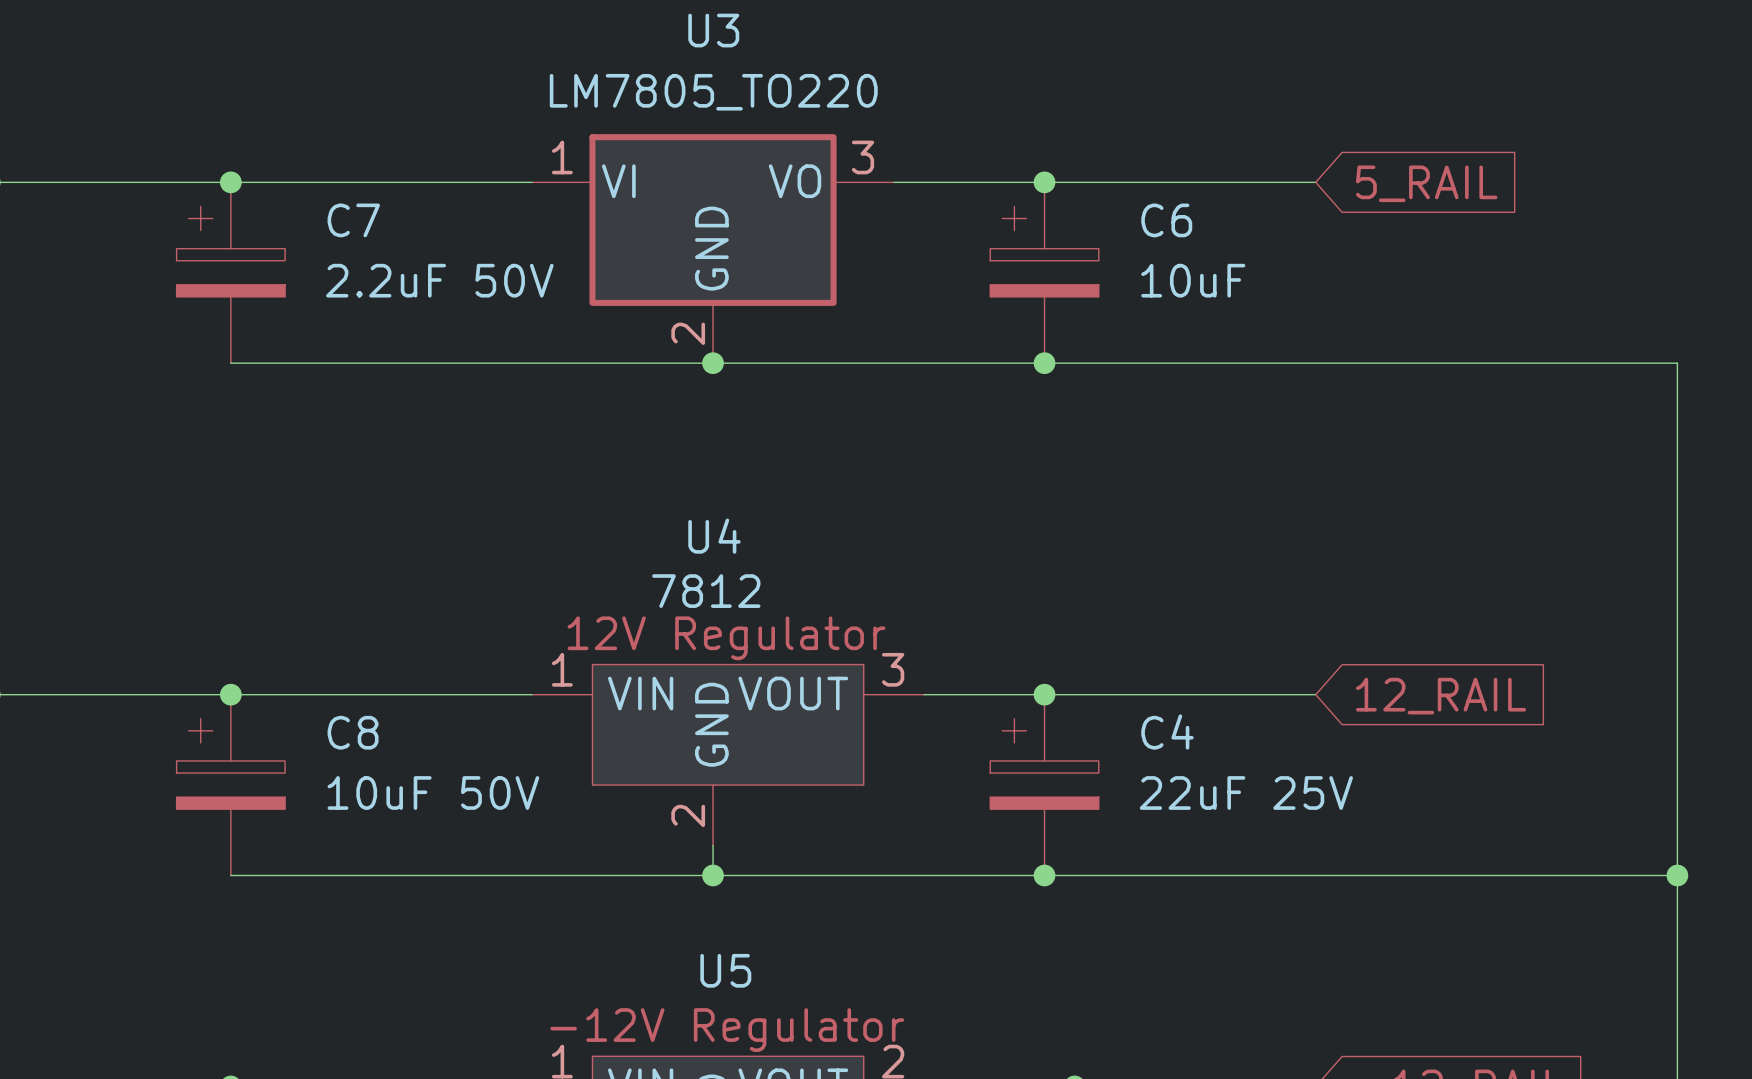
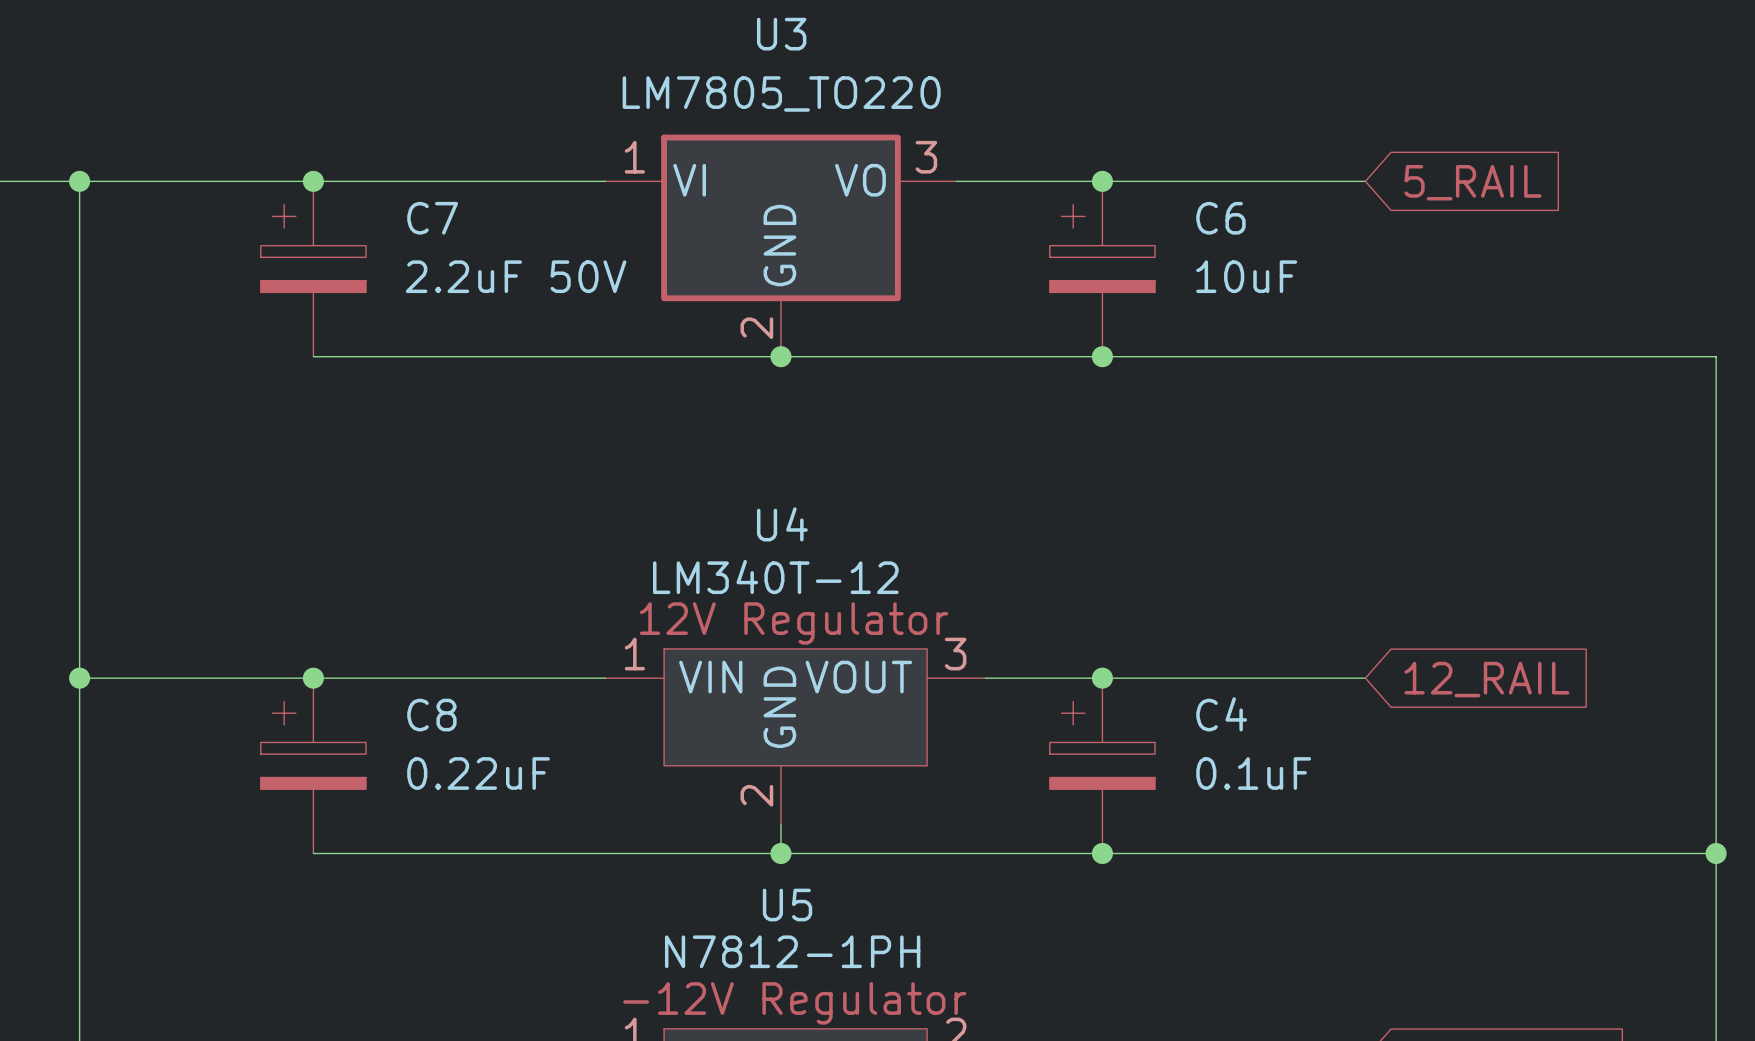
U4 value: 7812 (706, 591) -> LM340T-12 (775, 577)
C8 value: 10uF 50V (433, 792) -> 0.22uF (478, 773)
C4 value: 22uF 25V (1246, 792) -> 0.1uF (1253, 773)
U5 name position: U5 (725, 970) -> U5 (787, 905)
U5 value: none -> N7812-1PH (792, 951)

